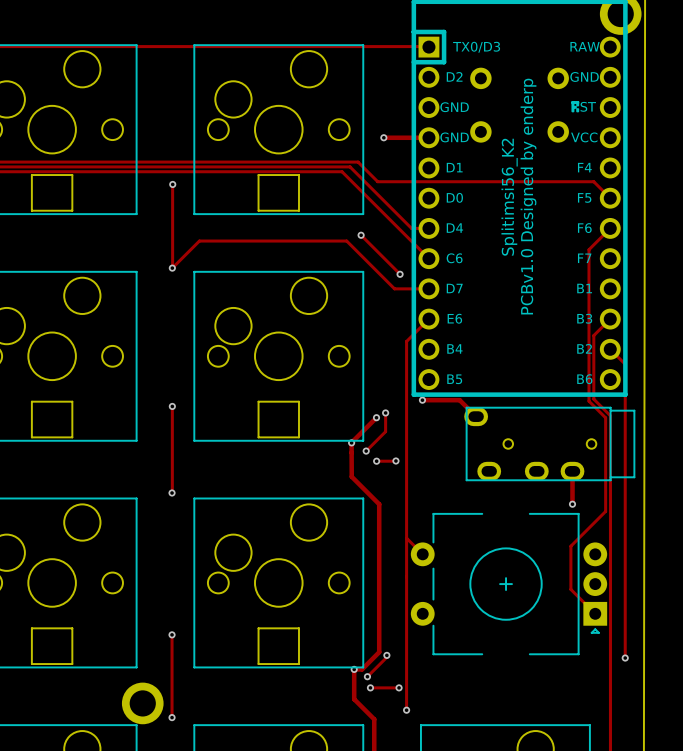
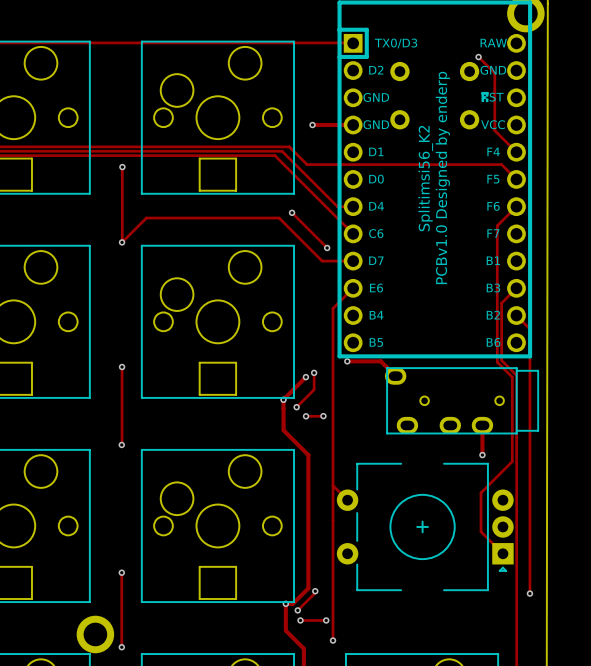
track: none -> (478, 57) (494, 73) (494, 130) (516, 152)
via: none -> (478, 57)

